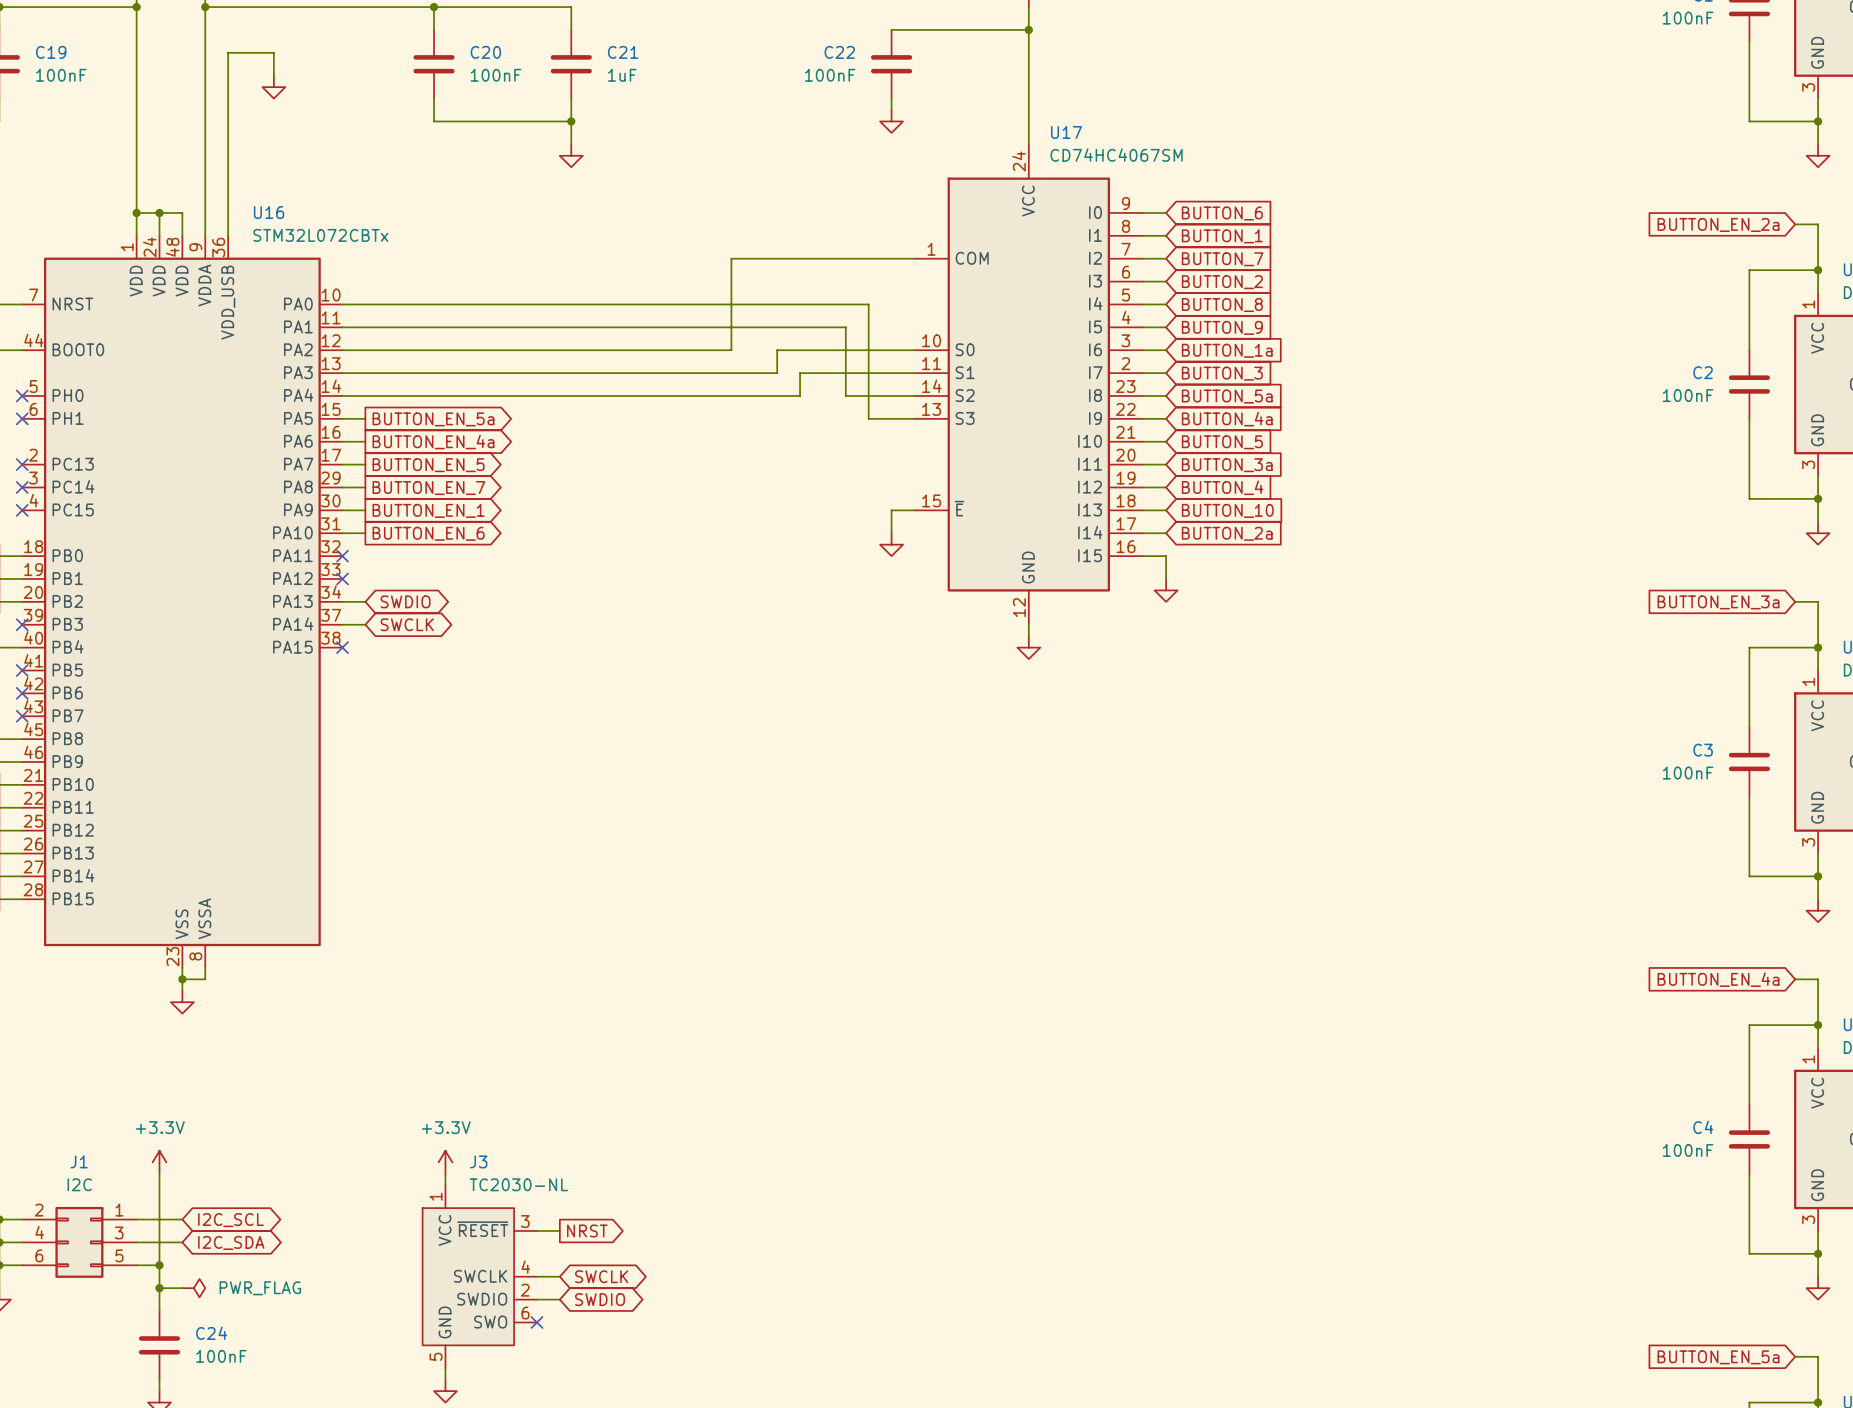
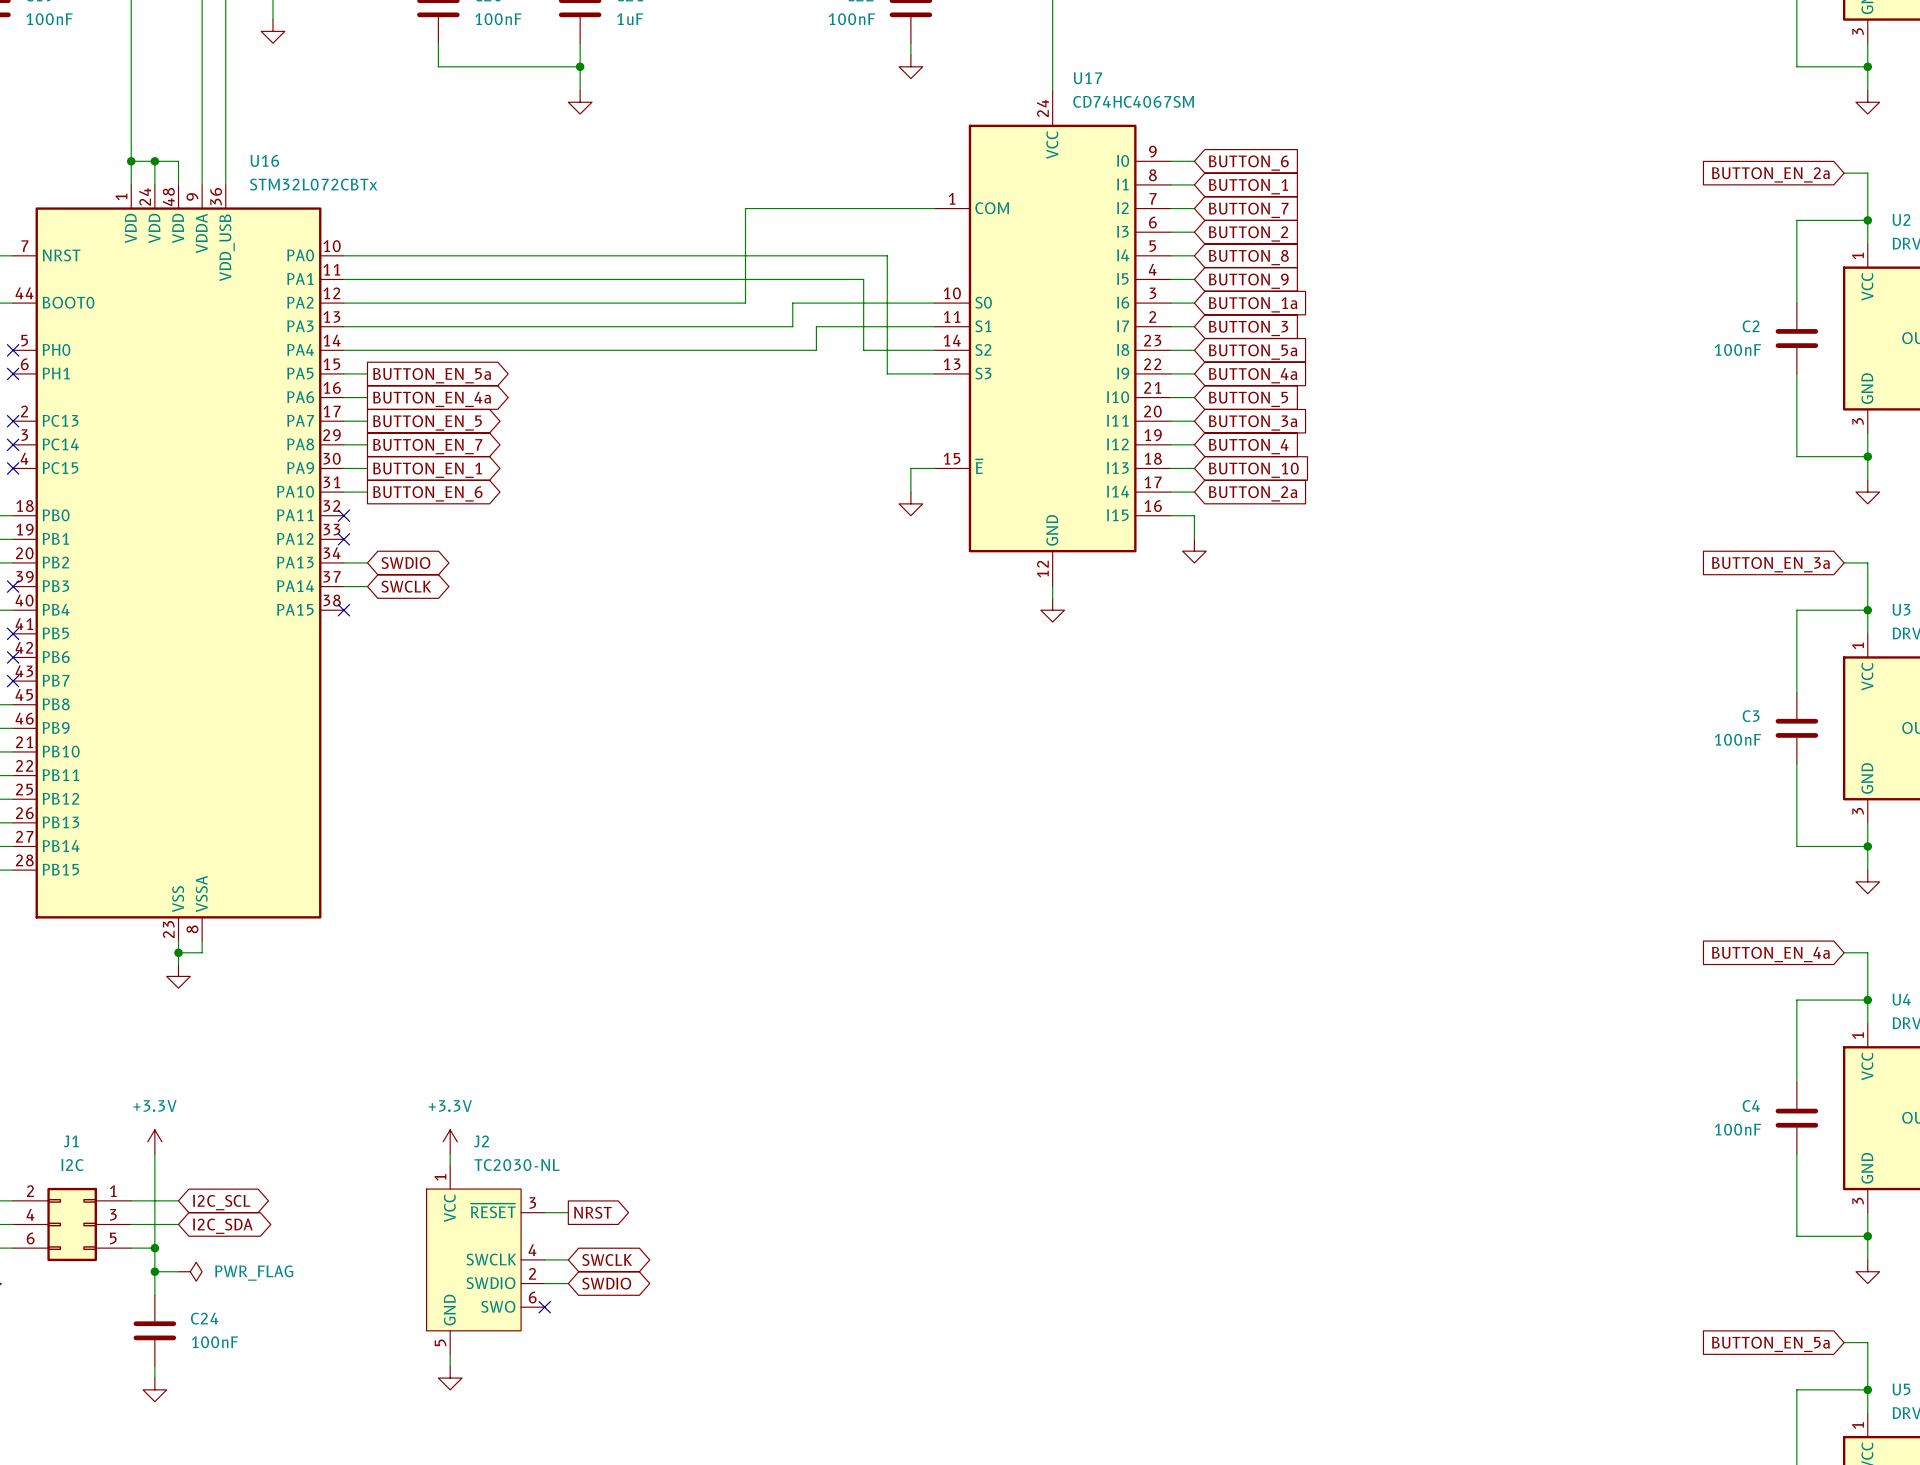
J3 name: J3 (478, 1161) -> J2 (481, 1141)

